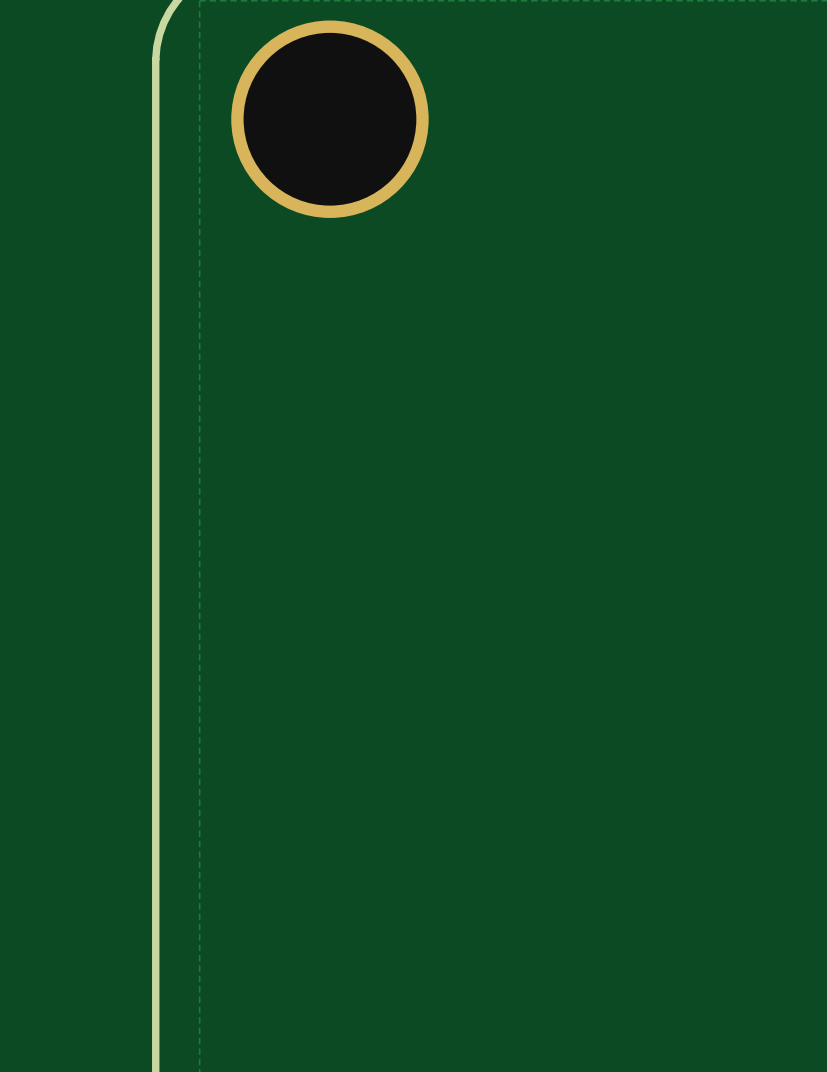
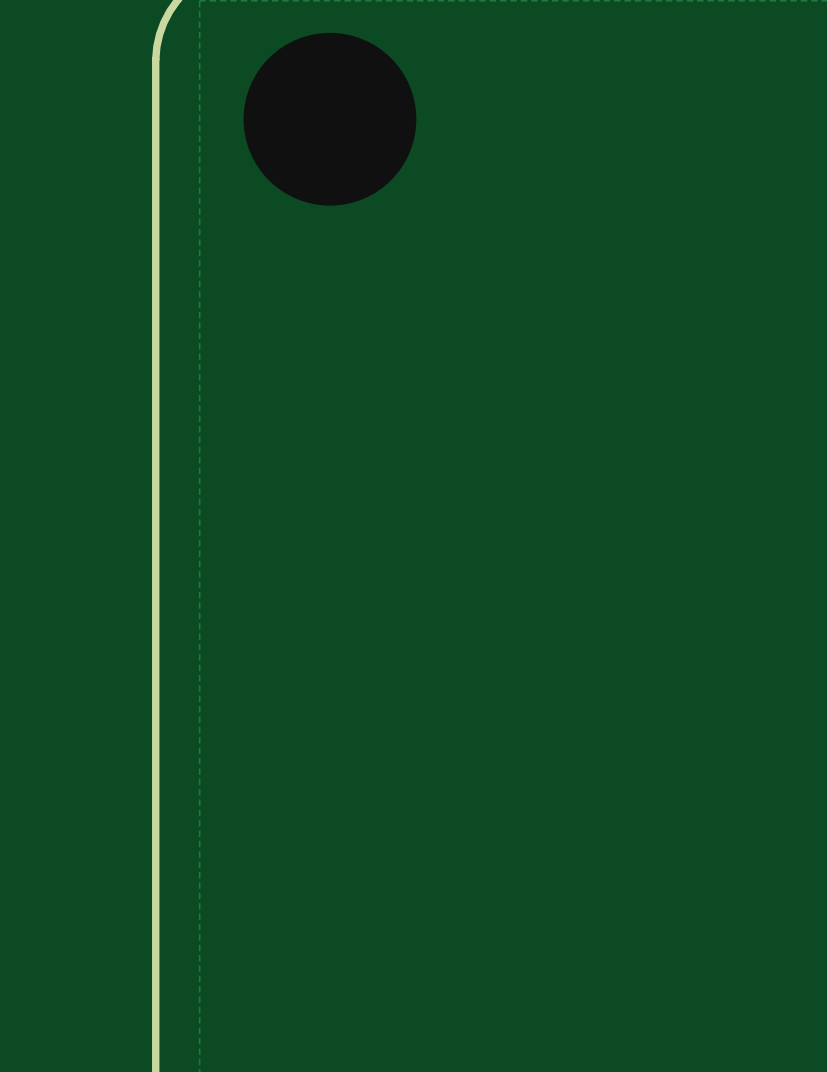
part footprint: [231, 20, 429, 218] -> [243, 32, 417, 206]

